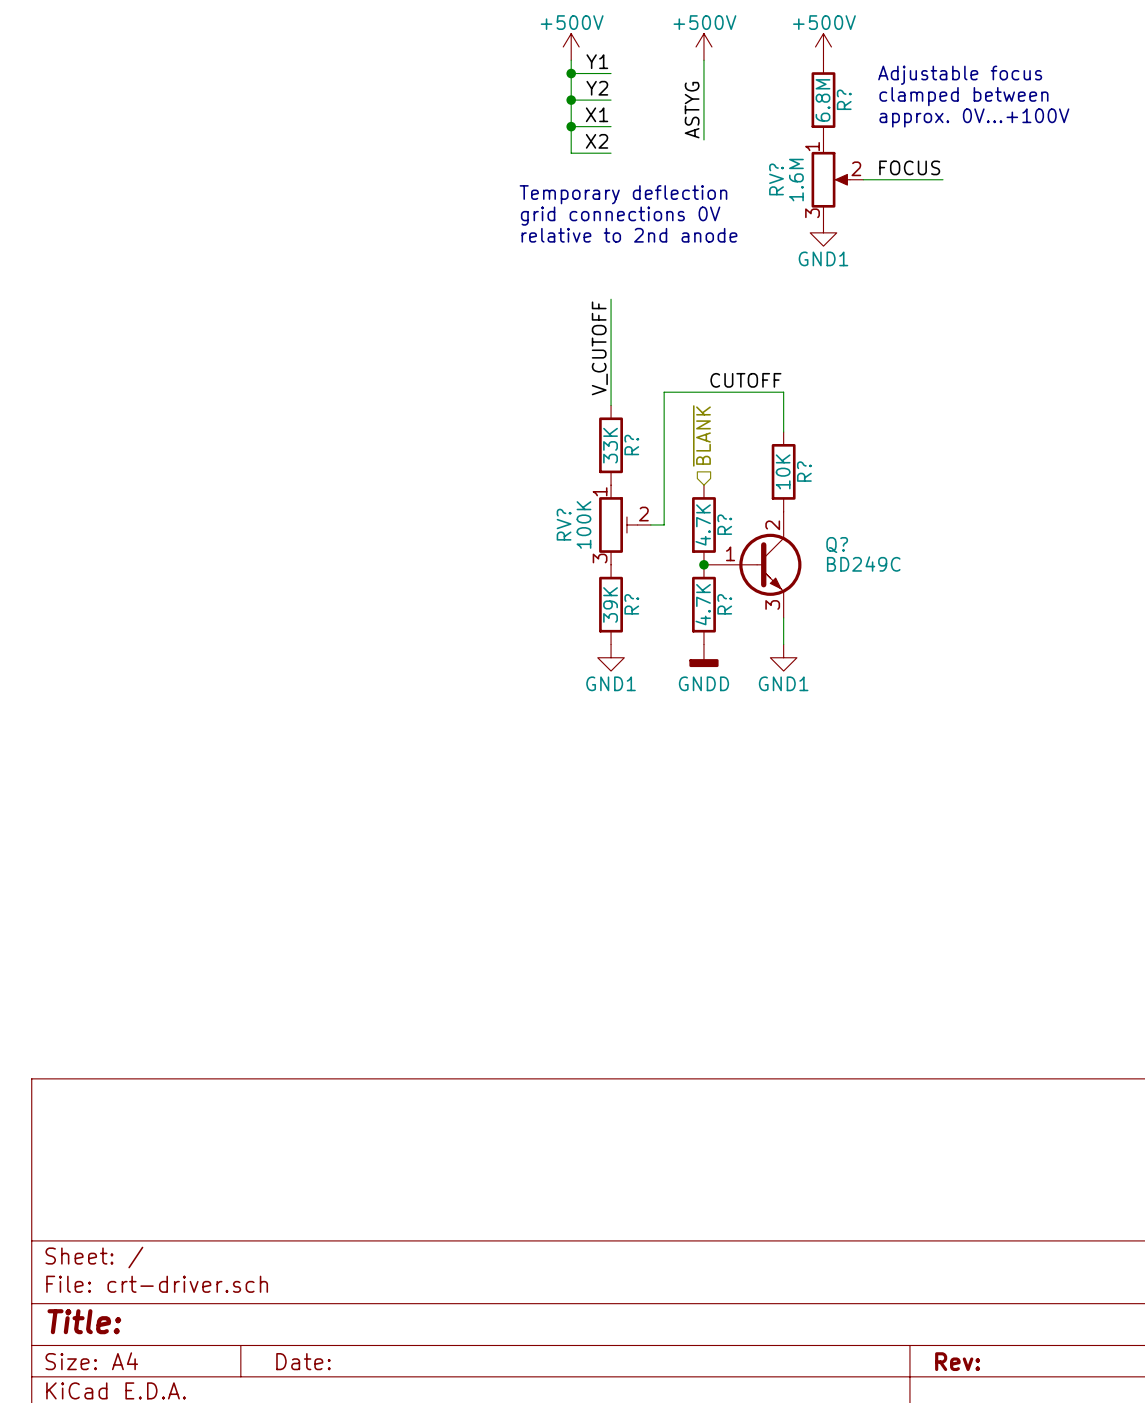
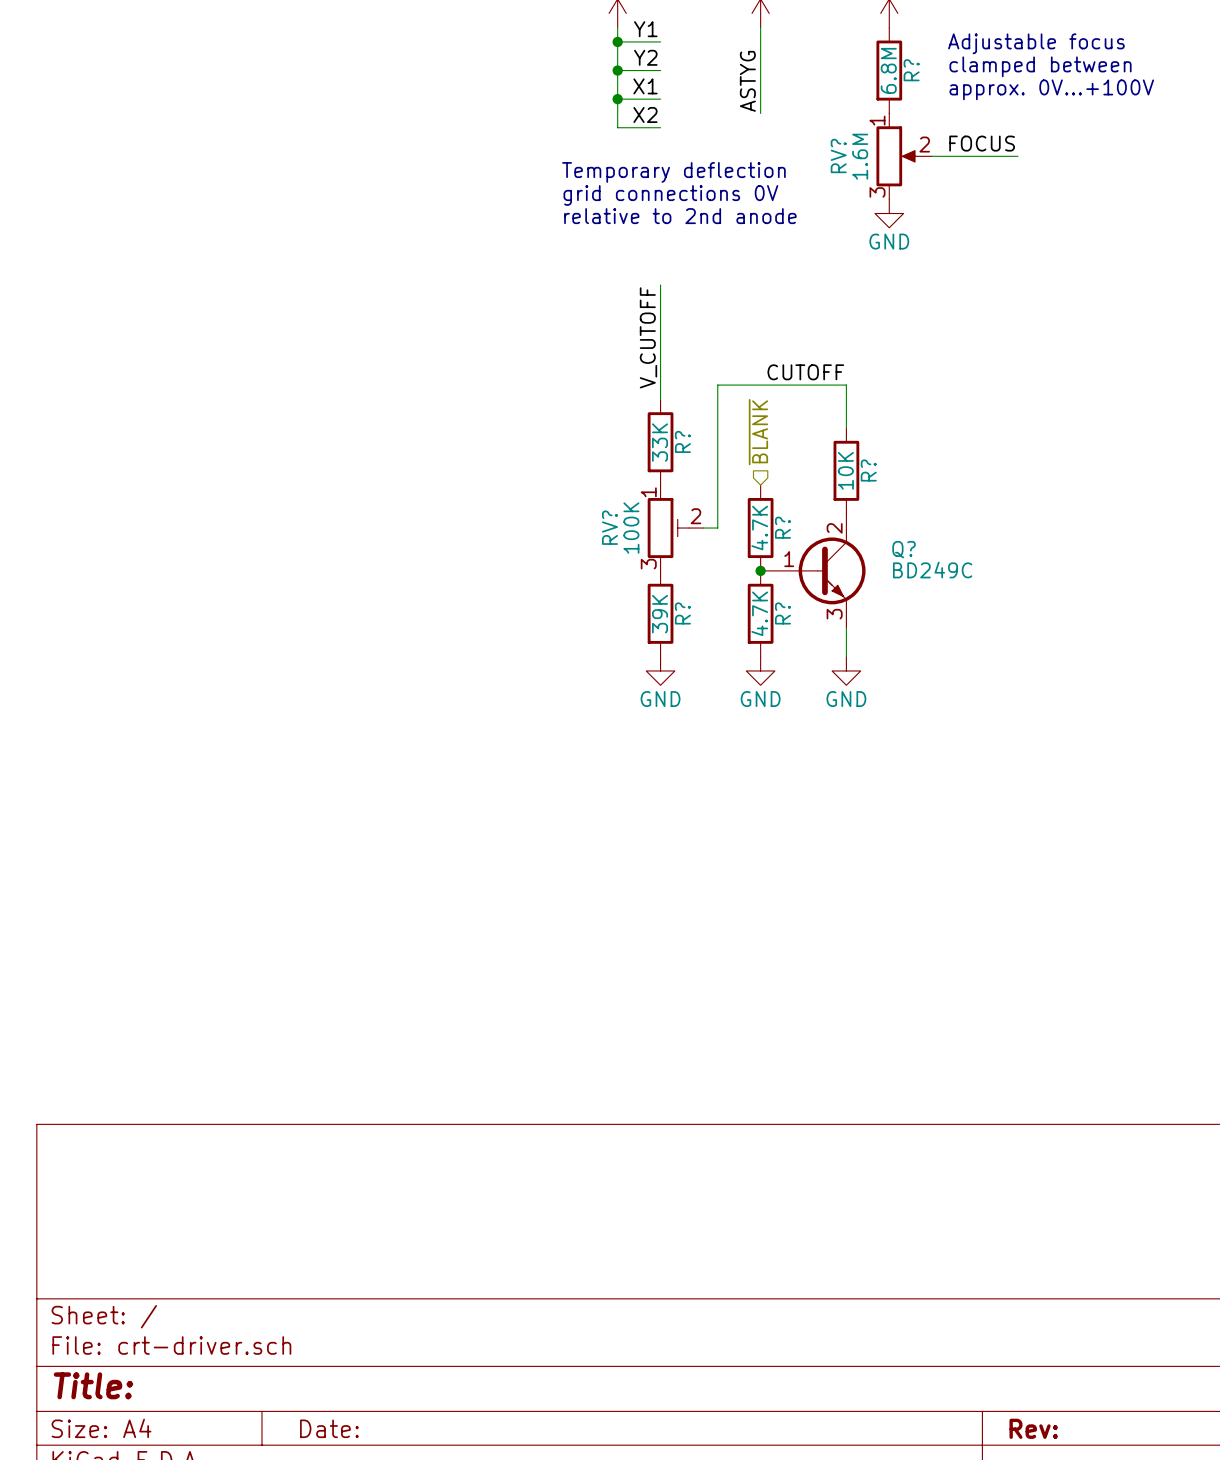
power symbol: GND1 (823, 232) -> GND (889, 213)
power symbol: GNDD (703, 655) -> GND (760, 670)
power symbol: GND1 (611, 657) -> GND (660, 670)
power symbol: GND1 (783, 657) -> GND (846, 670)

